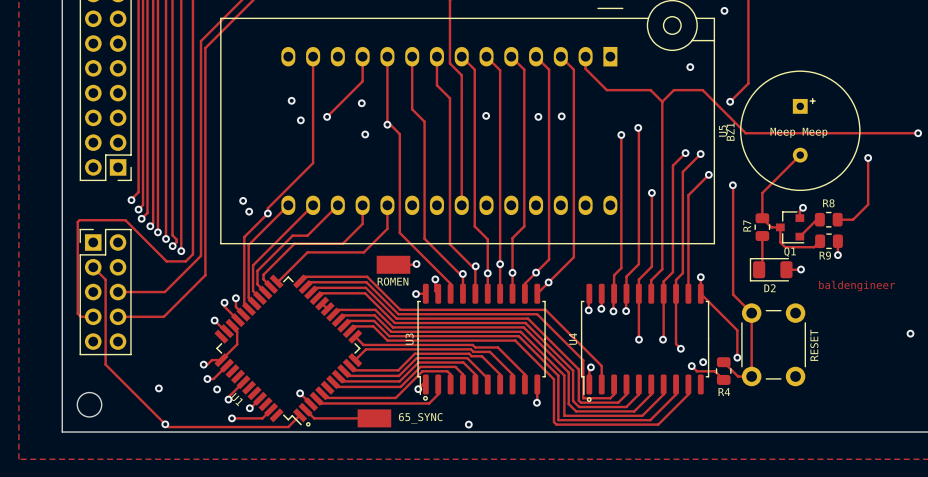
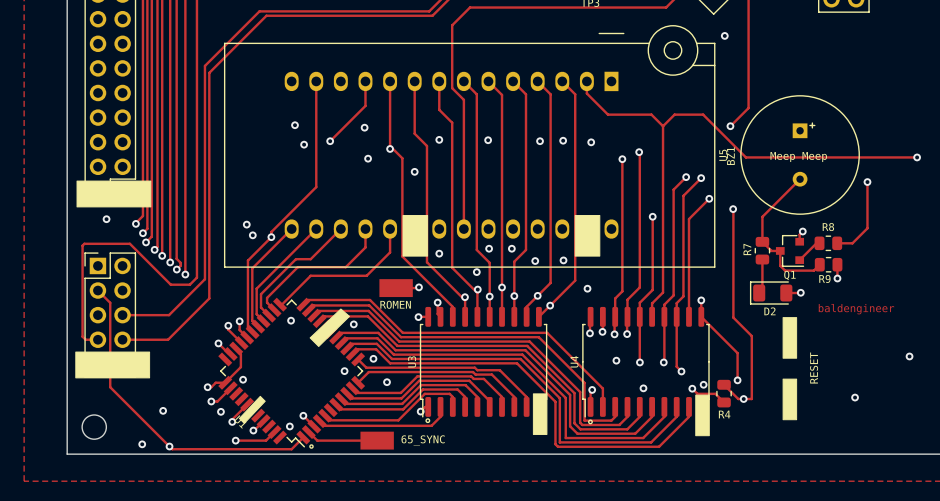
via: (690, 67) -> none
via: none -> (439, 139)
via: none -> (591, 142)
via: none -> (414, 171)
drawing: none -> [76, 180, 152, 208]
drawing: none -> [402, 215, 429, 257]
drawing: none -> [574, 215, 601, 257]
via: none -> (106, 219)
via: none -> (489, 248)
via: none -> (511, 248)
via: none -> (439, 253)
via: none -> (563, 260)
via: none -> (535, 261)
via: none -> (476, 272)
via: none -> (587, 288)
drawing: none -> [309, 308, 350, 348]
drawing: none -> [782, 317, 798, 359]
via: none -> (291, 320)
via: none -> (353, 324)
drawing: none -> [75, 351, 151, 379]
via: none -> (373, 358)
via: none -> (616, 360)
part: (773, 344) -> none
via: none -> (344, 371)
drawing: none -> [782, 378, 798, 421]
via: none -> (243, 379)
via: none -> (387, 382)
via: none -> (643, 388)
drawing: none -> [532, 393, 548, 435]
drawing: none -> [695, 394, 710, 437]
drawing: none -> [238, 395, 266, 424]
via: none -> (855, 397)
via: none -> (743, 399)
via: none -> (289, 426)
via: none -> (142, 444)
via: (468, 424) -> none

